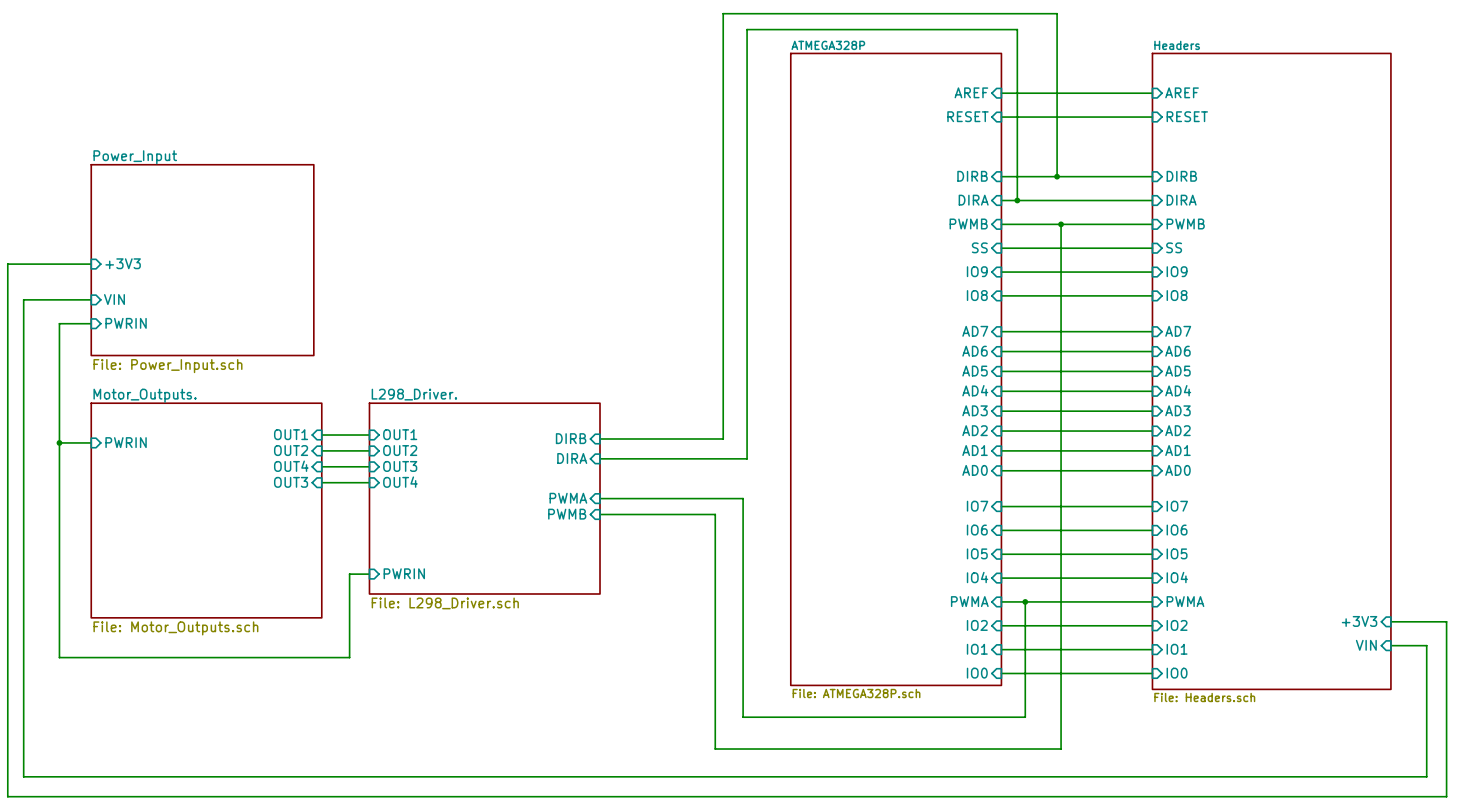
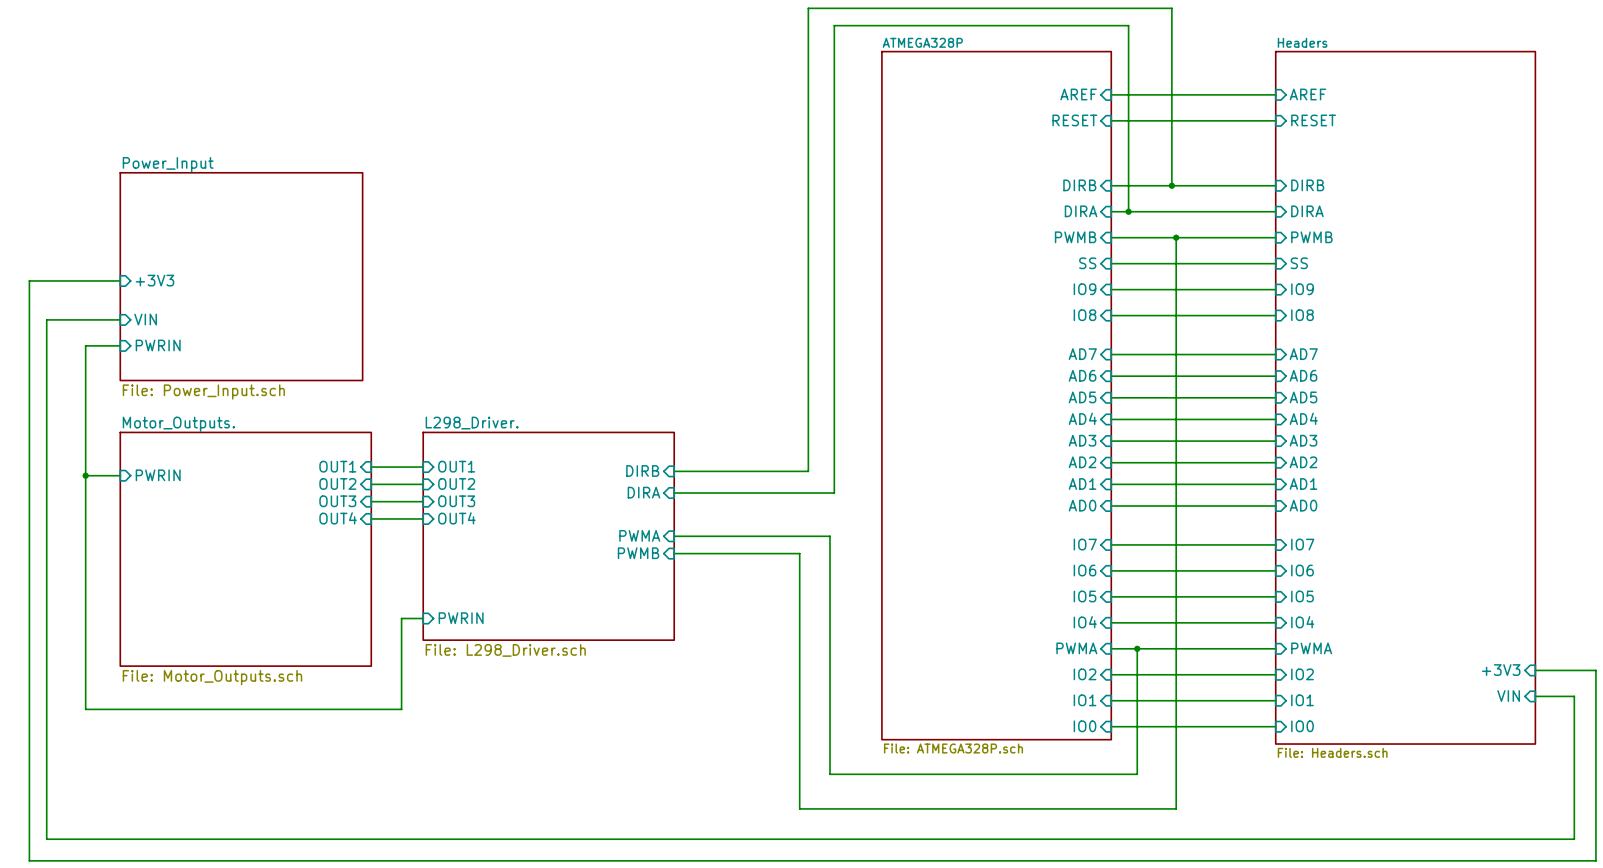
sheet pin: OUT4 (291, 466) -> OUT3 (337, 501)
sheet pin: OUT3 (291, 482) -> OUT4 (338, 518)

